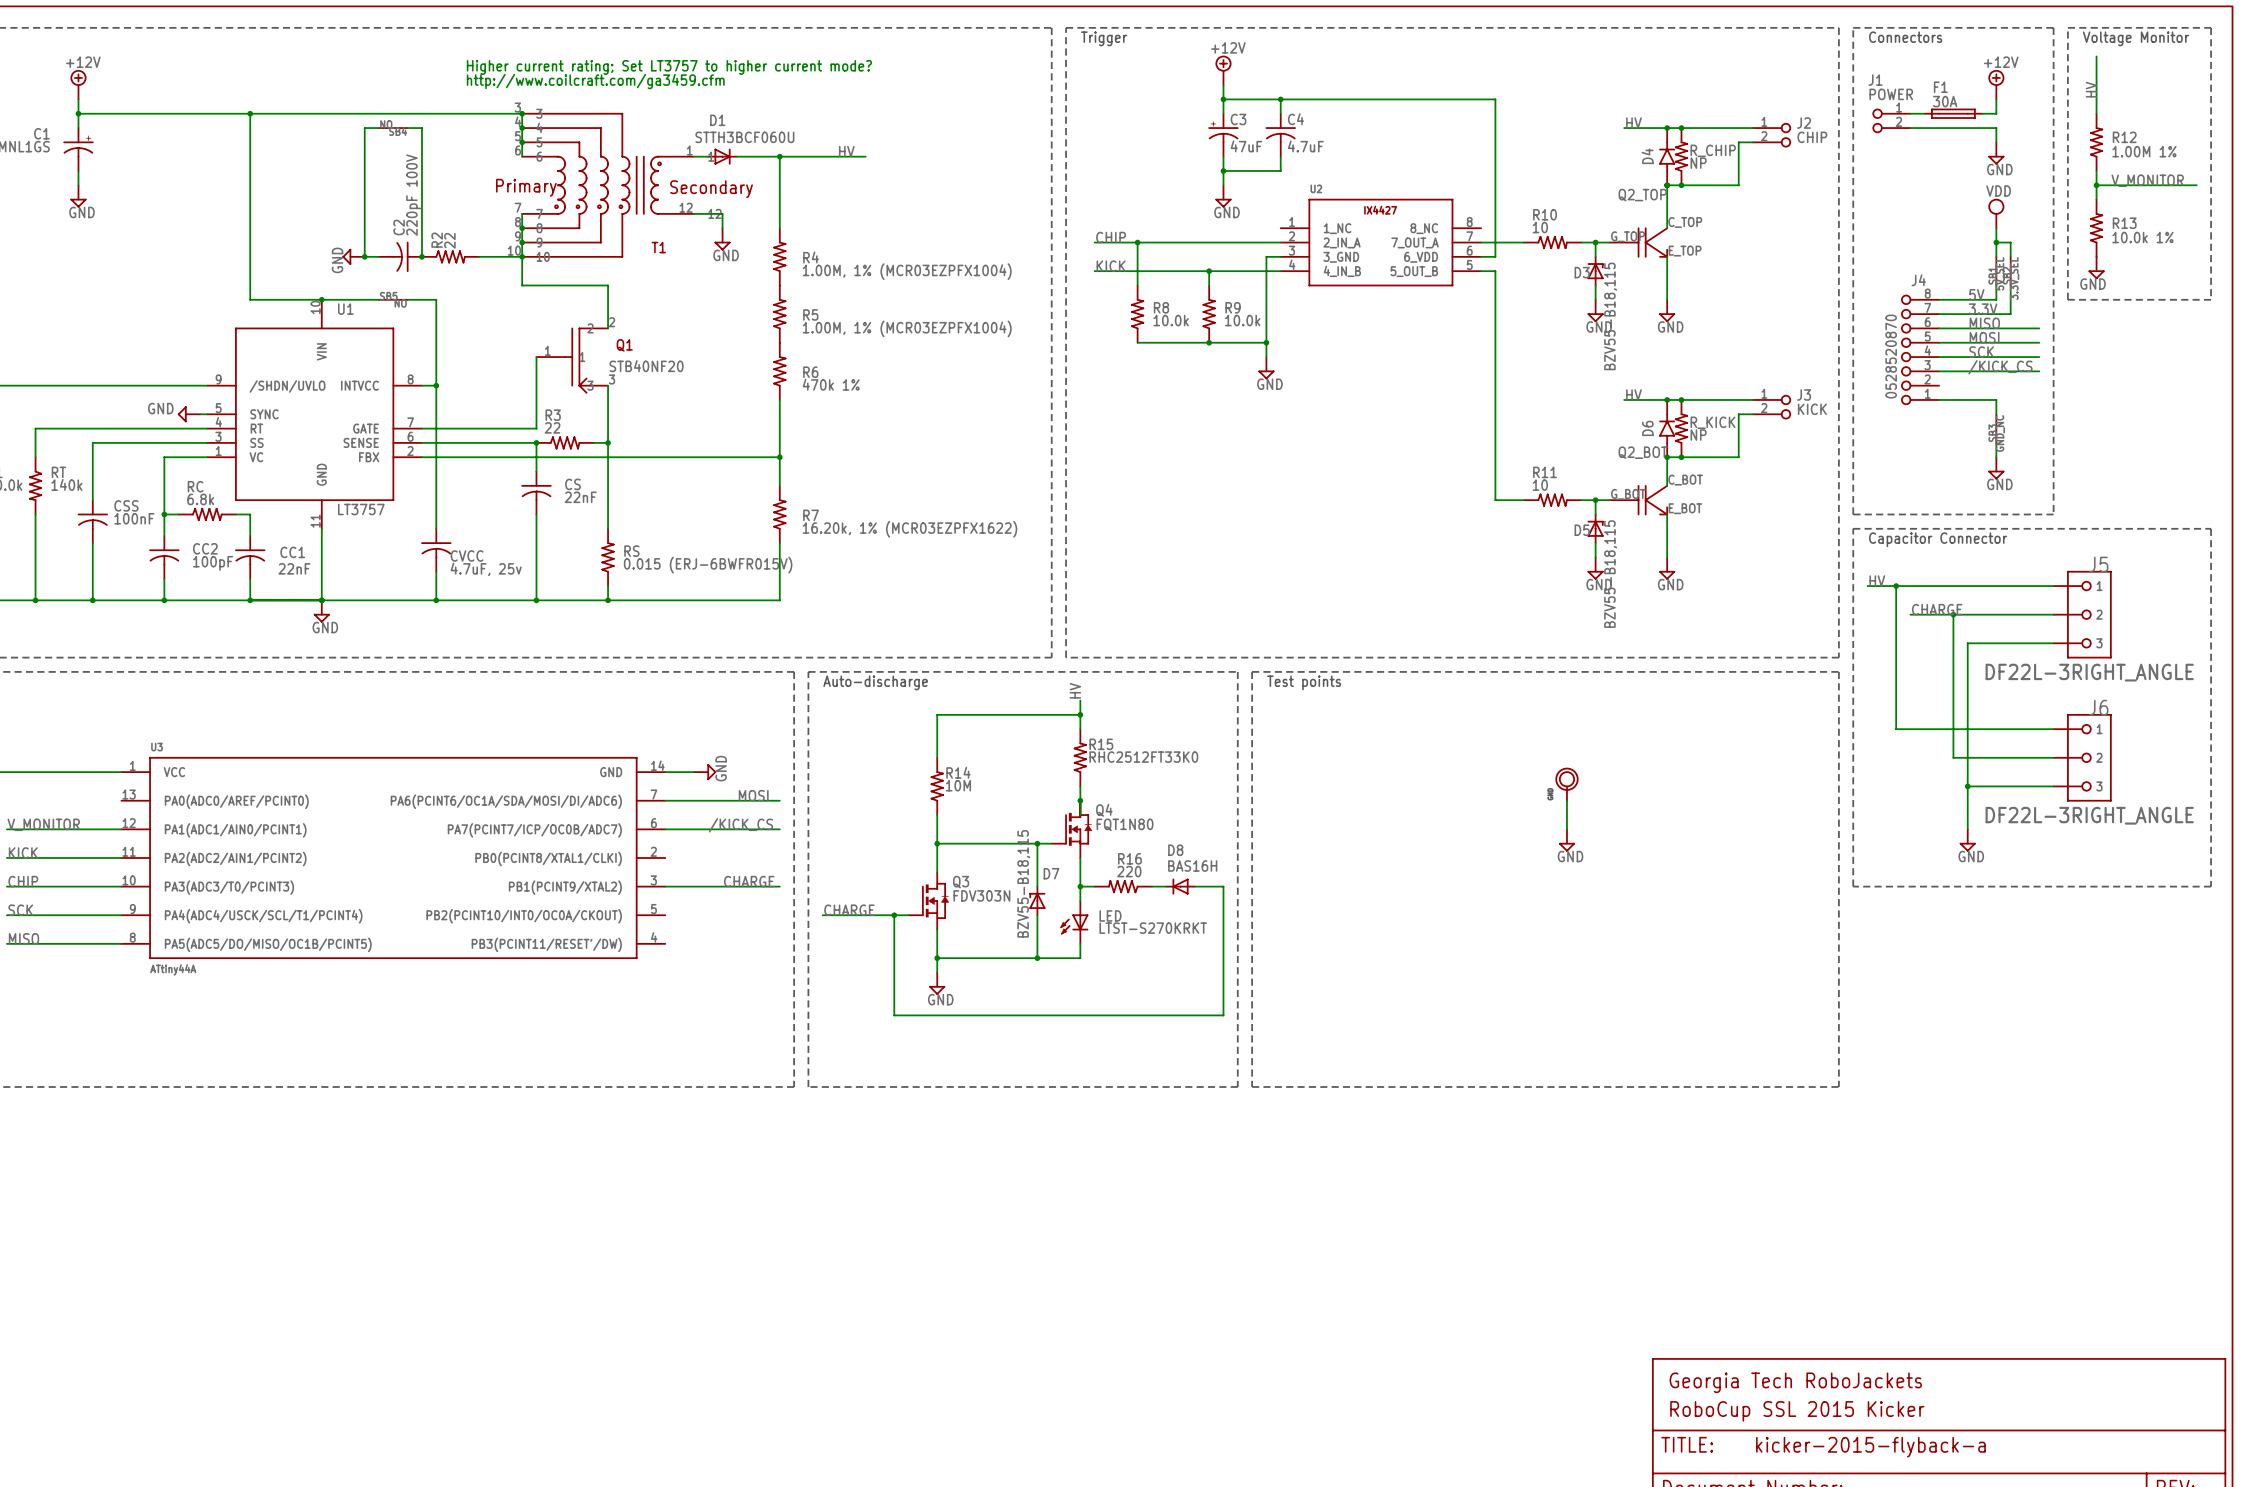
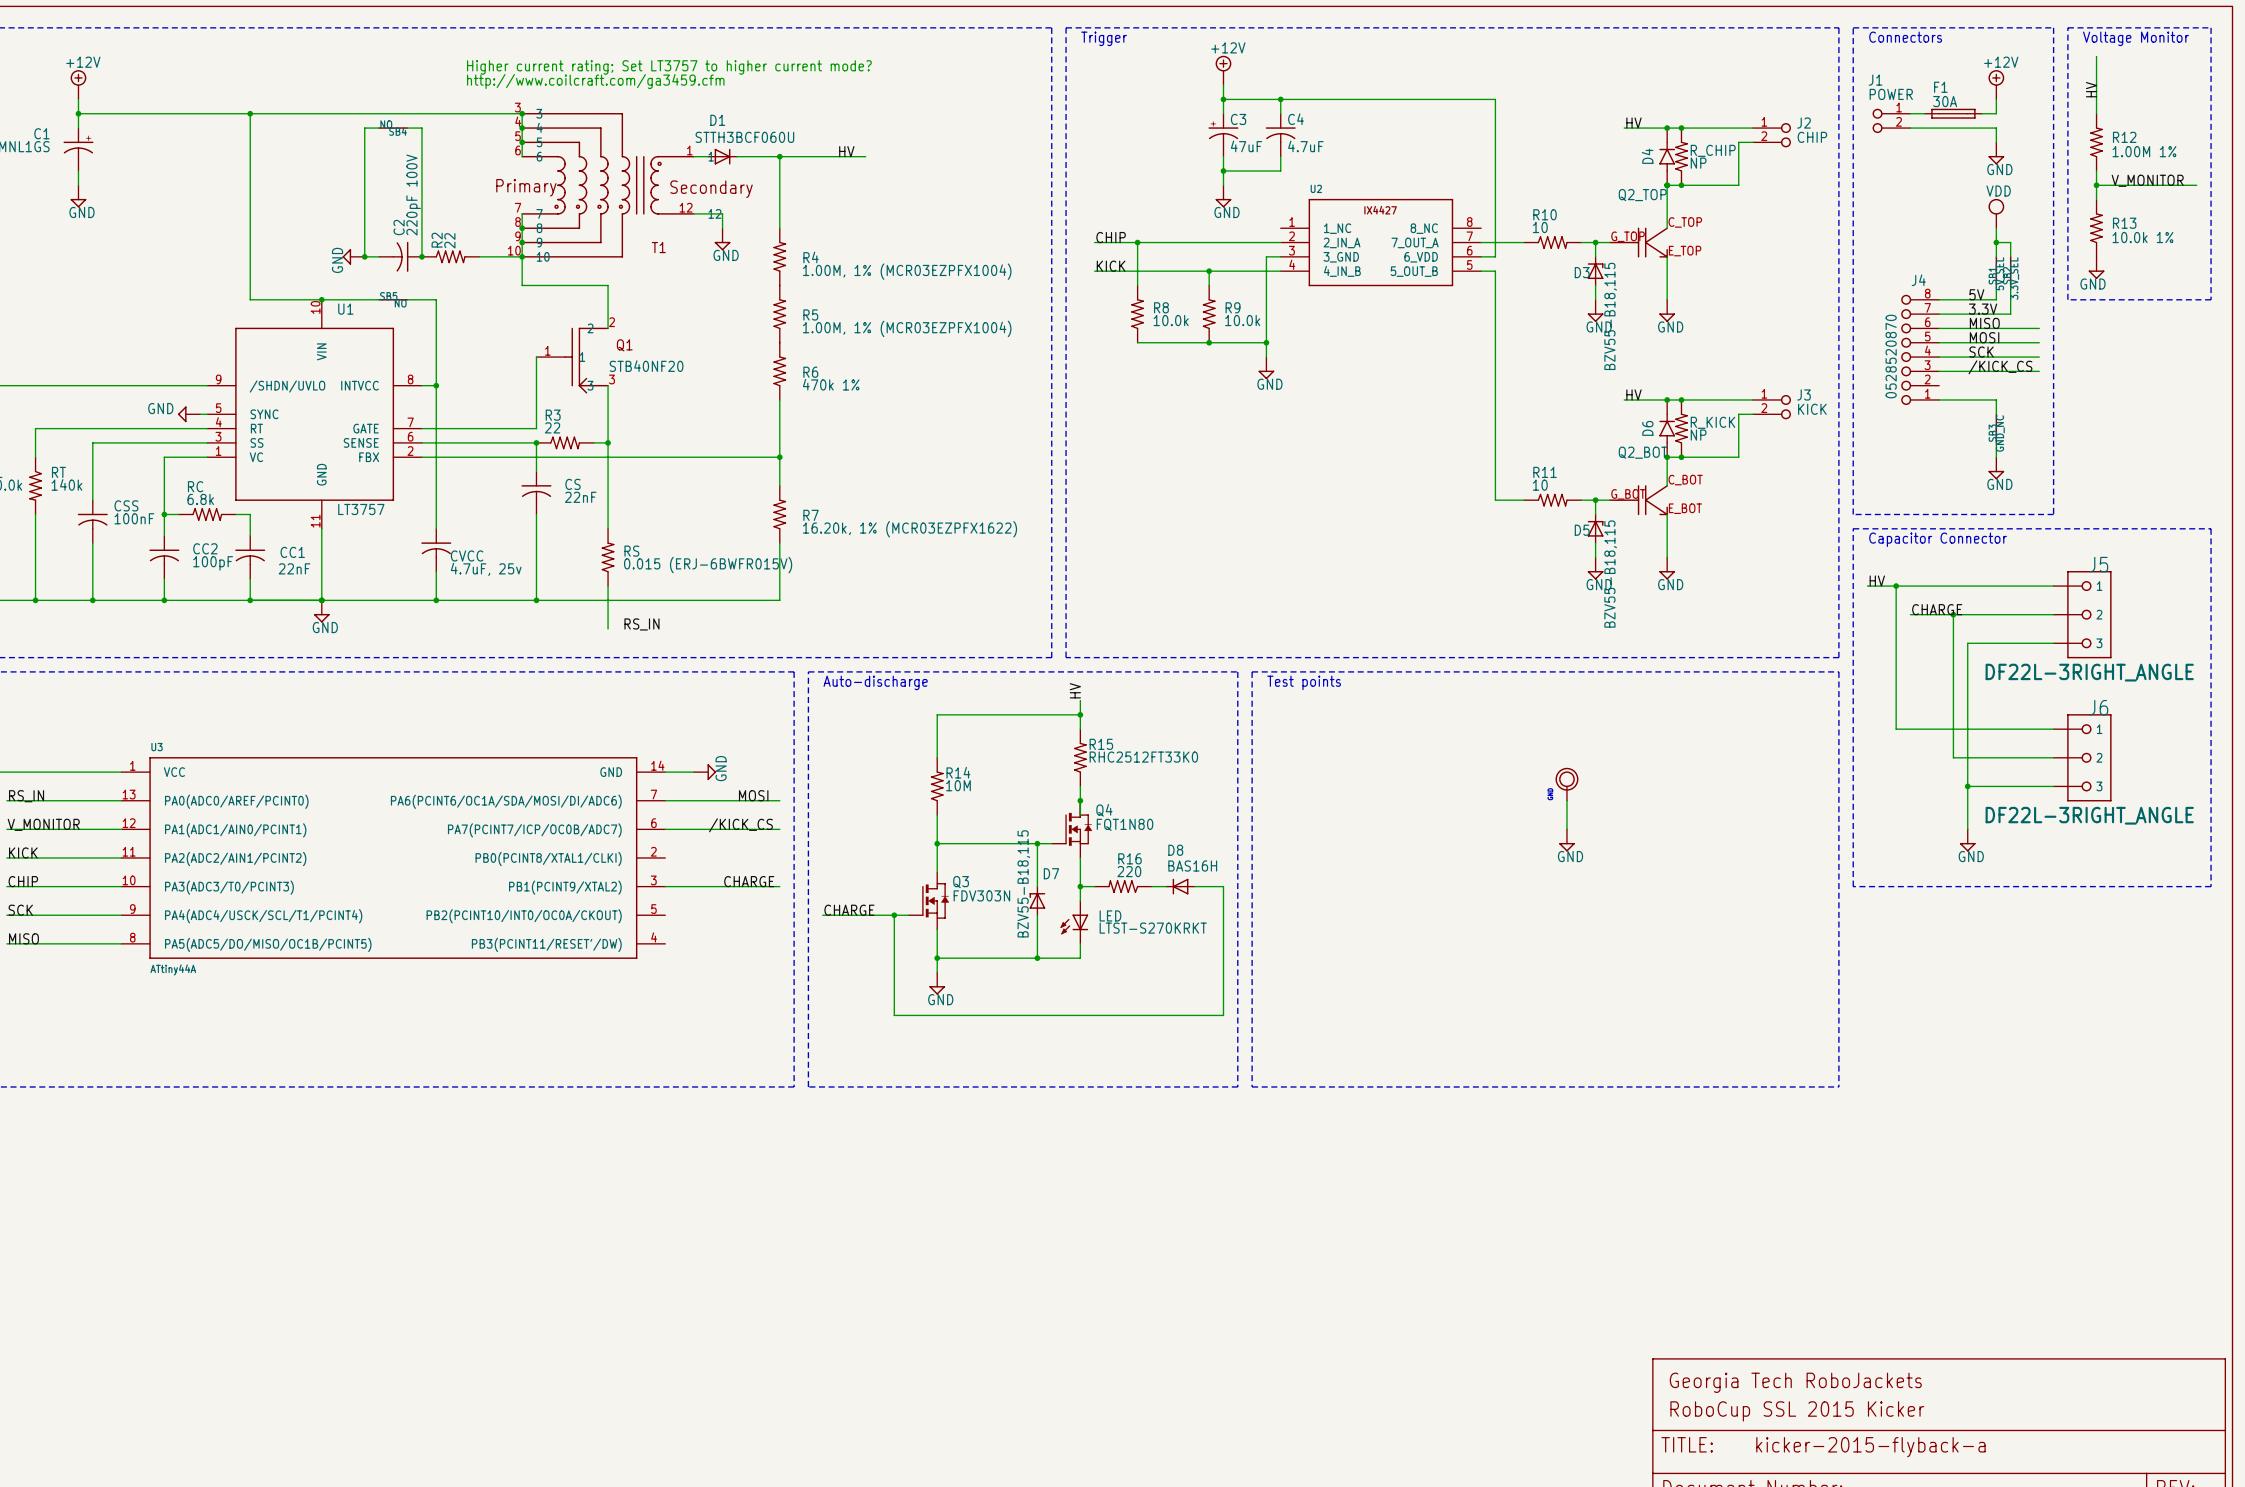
wire: none -> (608, 600) (608, 628)
junction: (608, 600) -> none
label: none -> RS_IN (641, 624)
label: none -> RS_IN (26, 796)
wire: none -> (6, 800) (121, 800)

